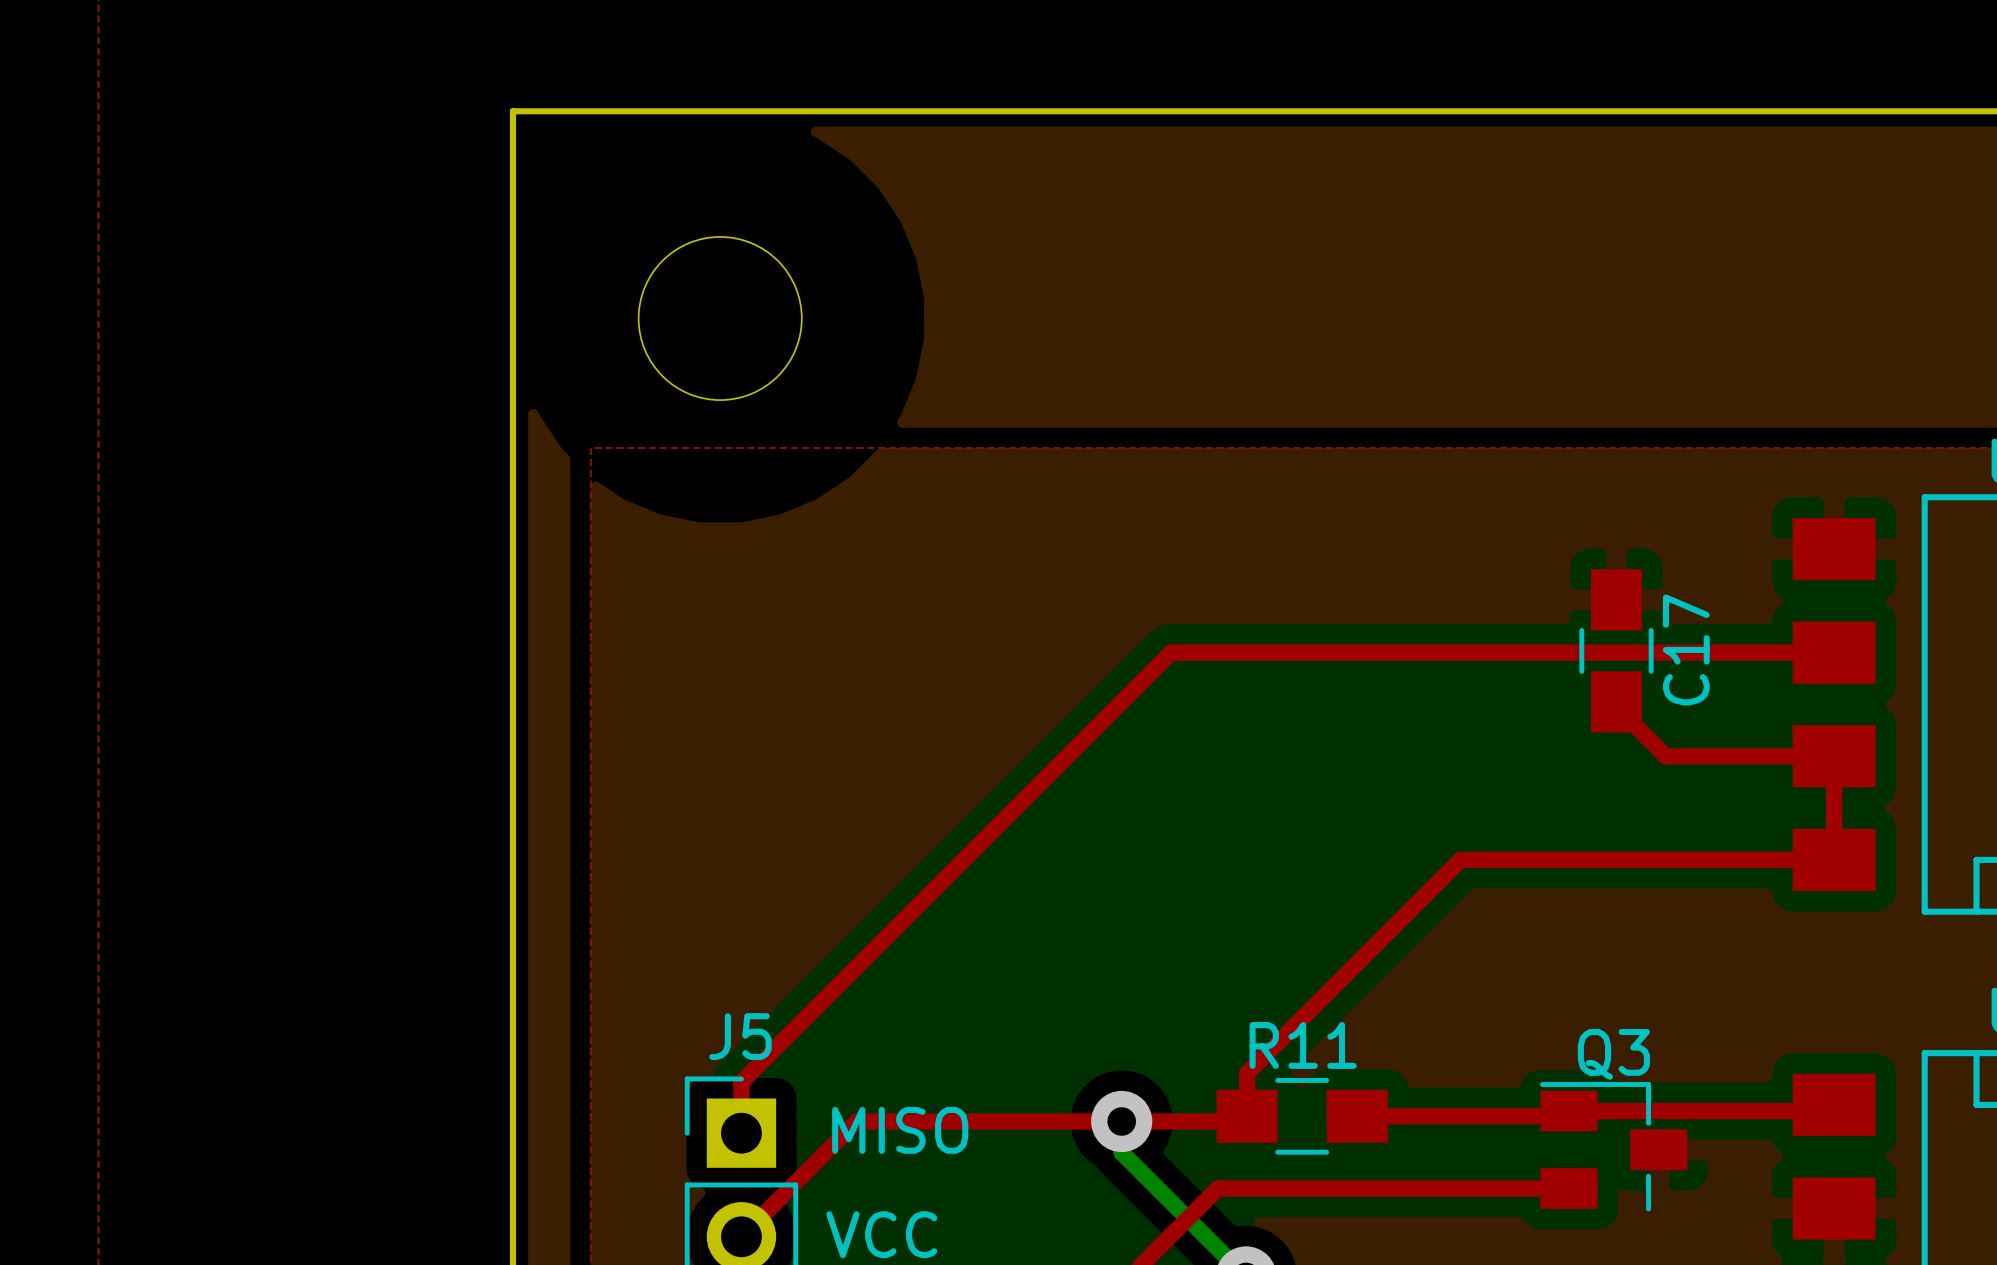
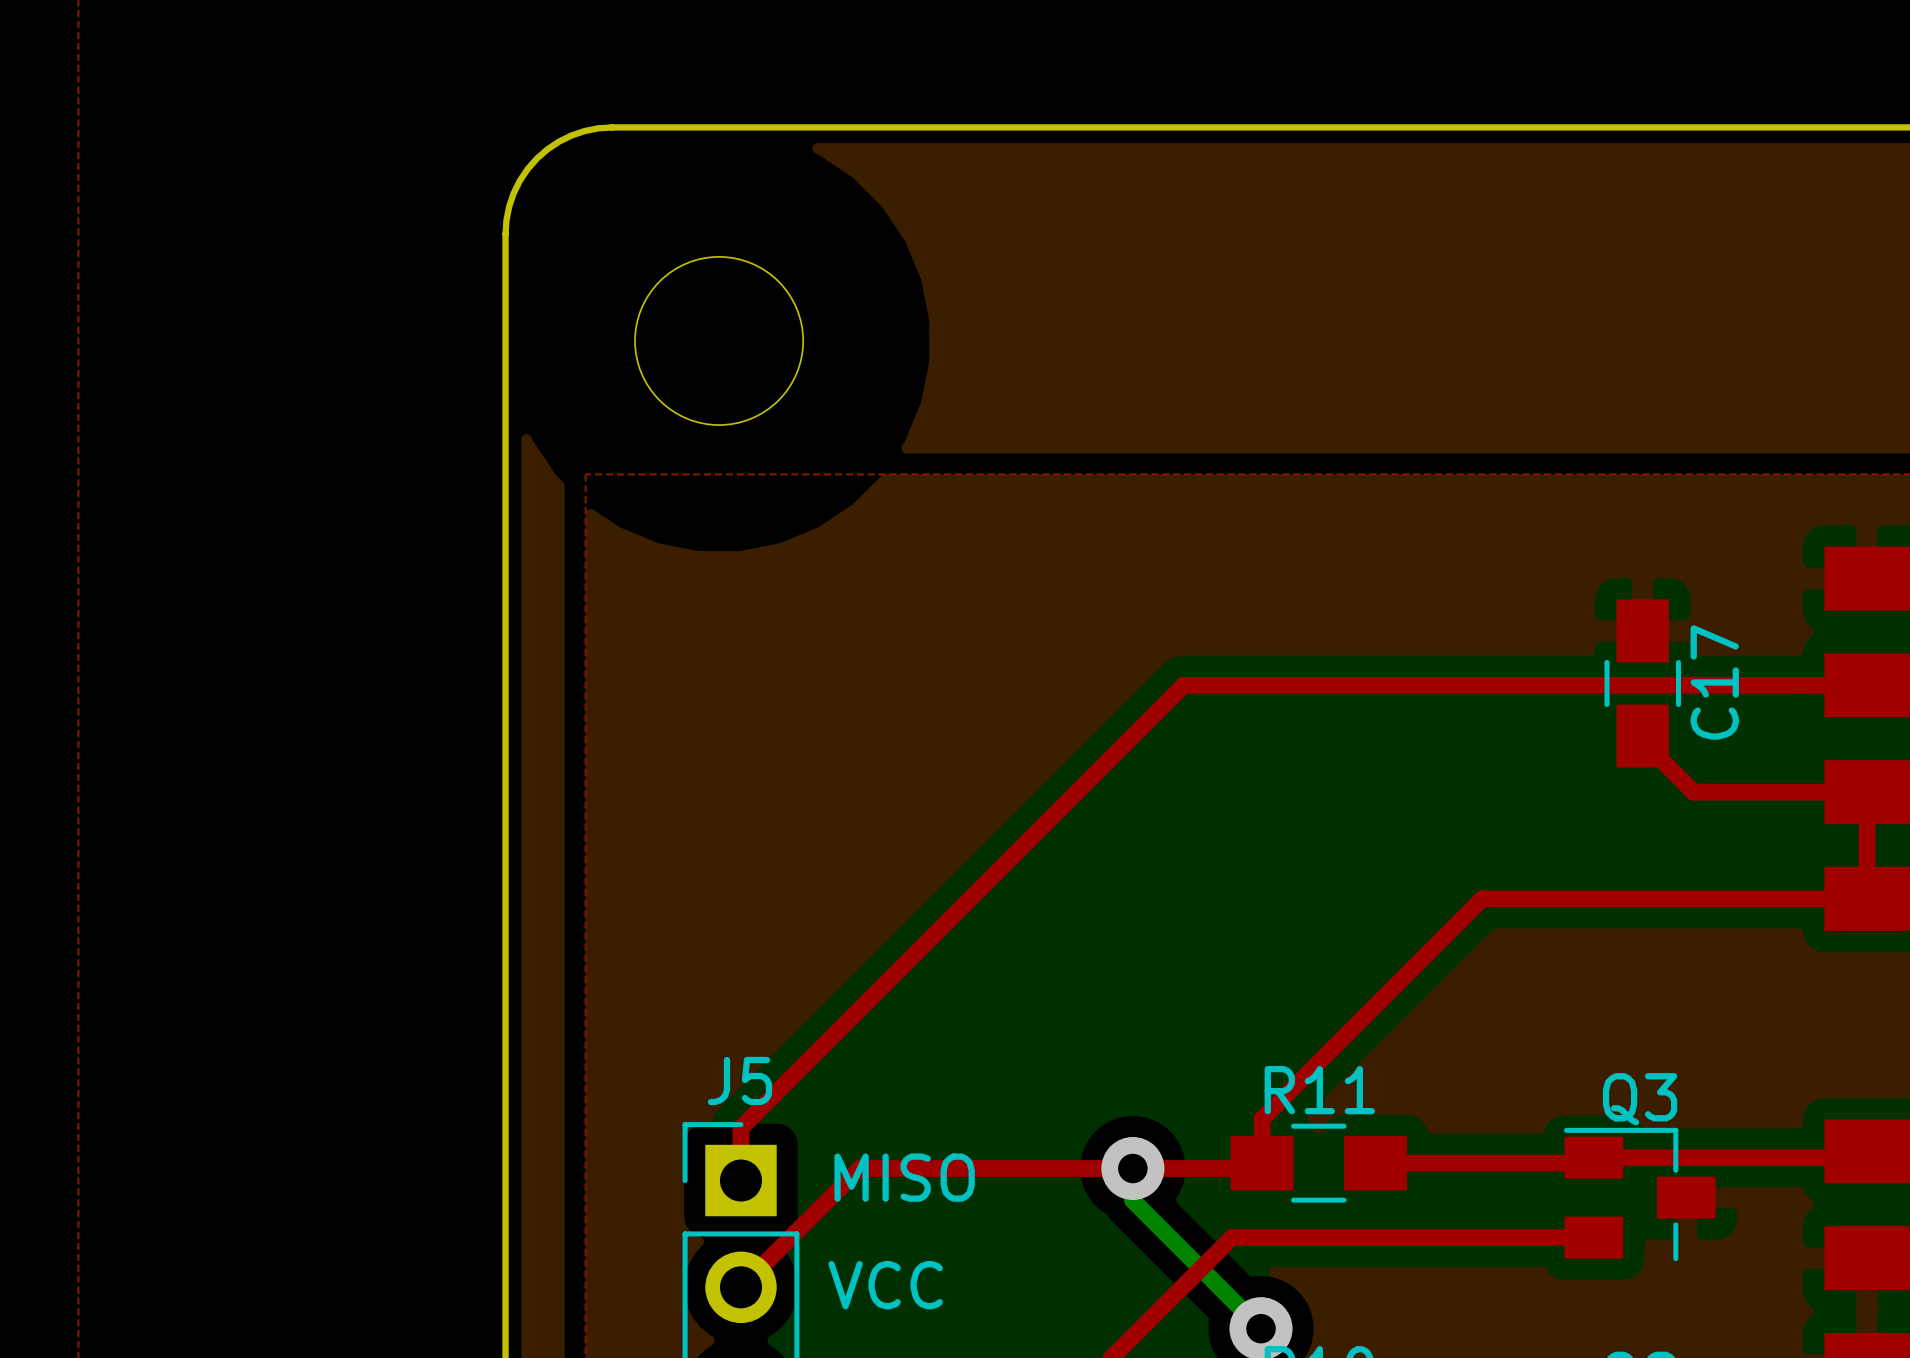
board edge: (616, 111) (512, 111) (512, 214) -> (612, 127) (598, 128) (571, 135) (547, 149) (536, 158) (527, 169) (513, 193) (506, 220) (505, 234)

